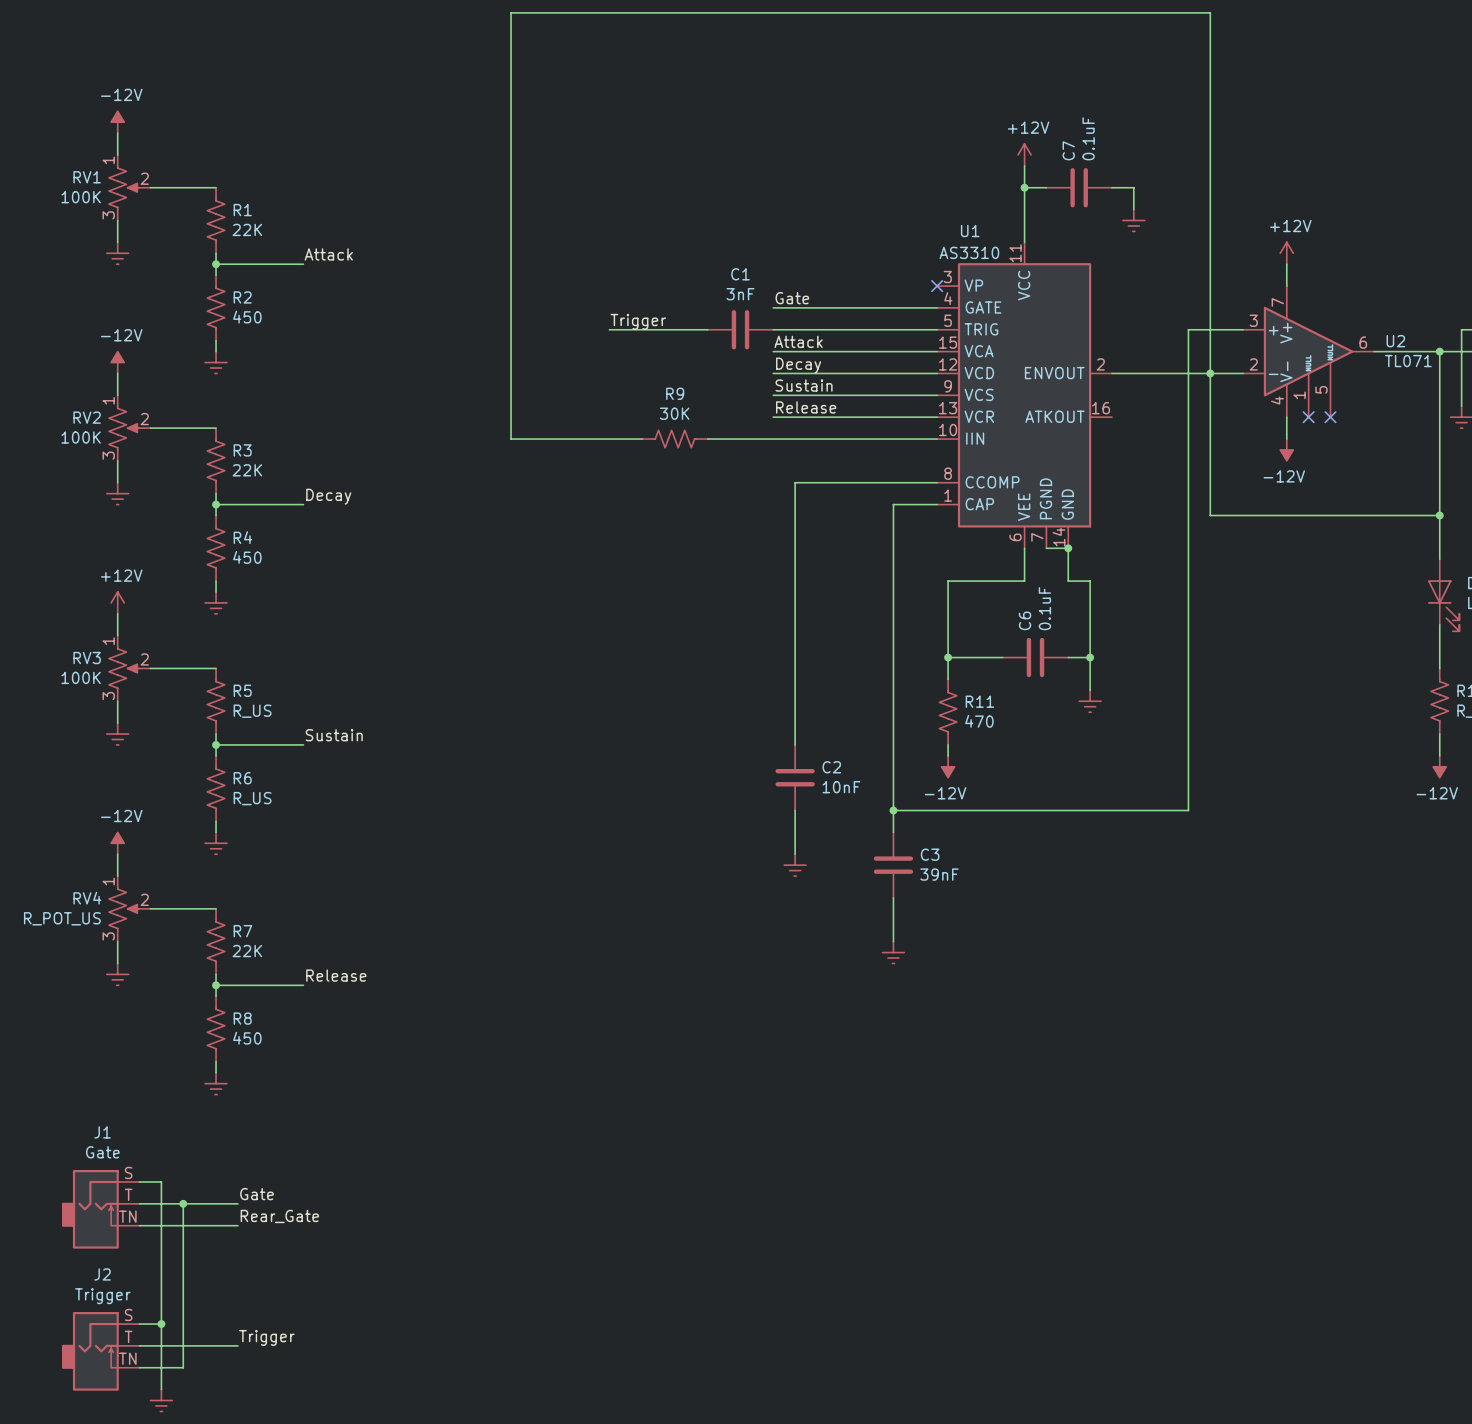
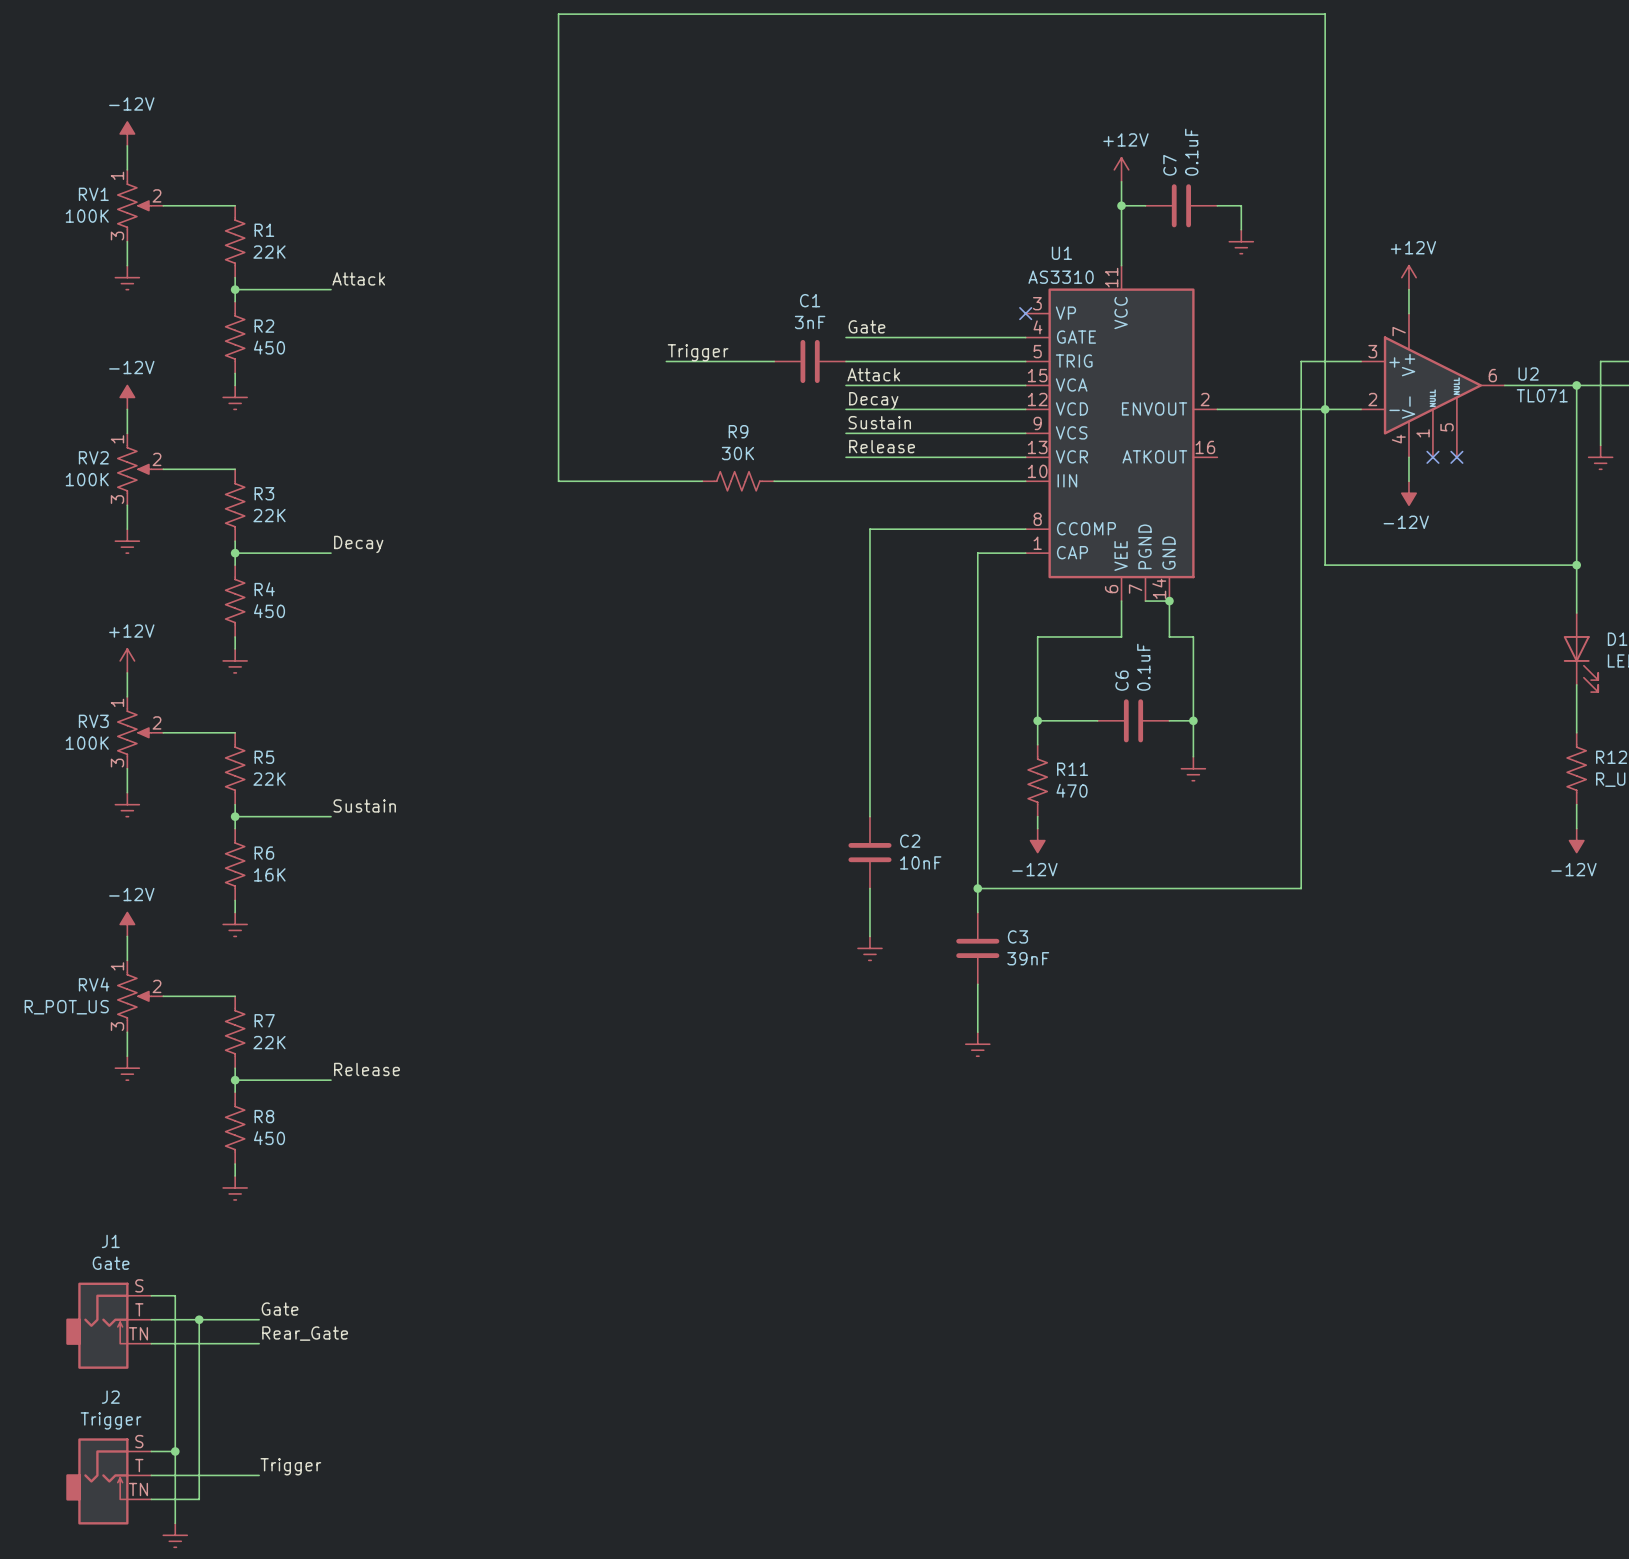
R5 value: R_US (252, 711) -> 22K (269, 779)
R6 value: R_US (252, 798) -> 16K (269, 874)

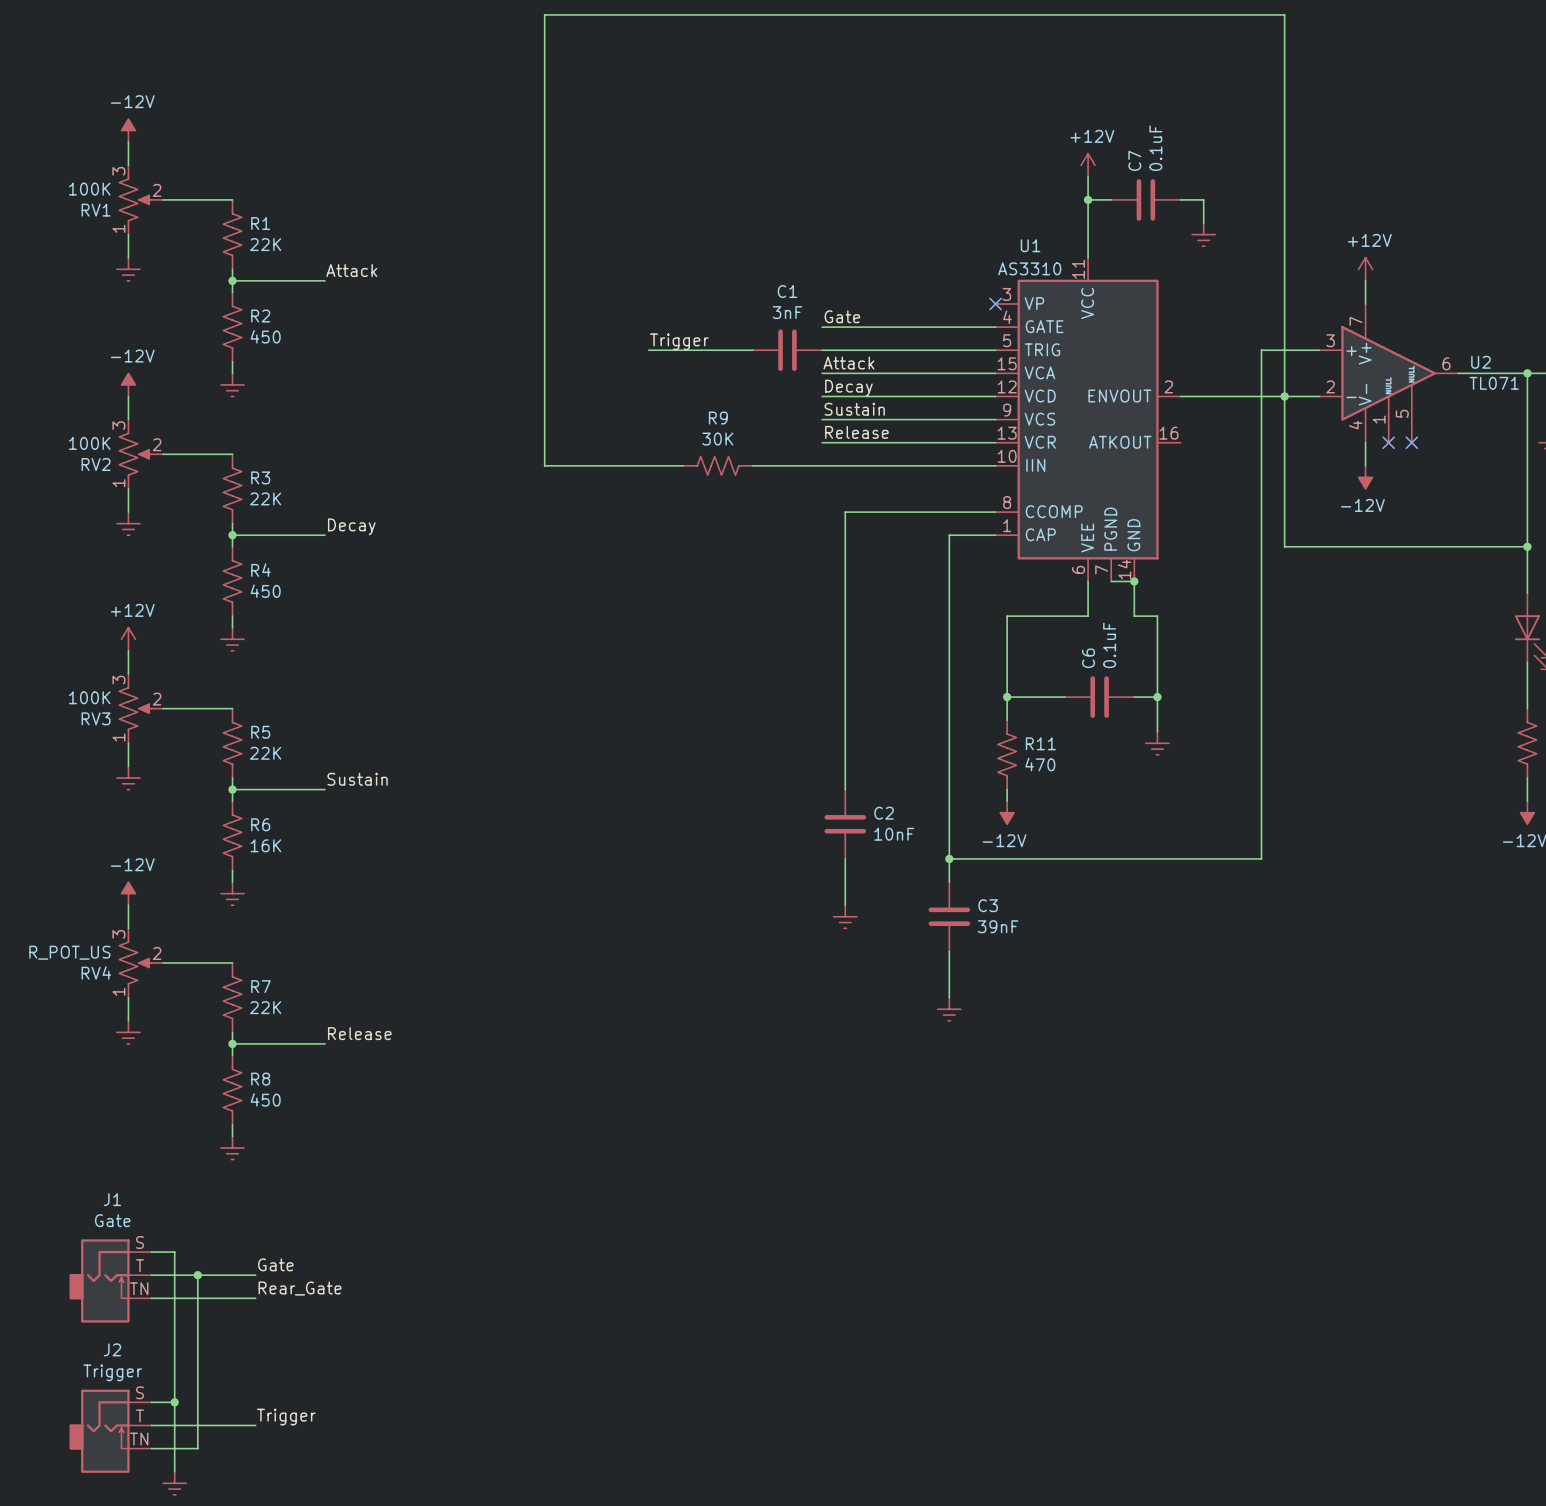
RV1 flip: as is (134, 205) -> up-down (135, 199)
RV2 flip: as is (134, 469) -> up-down (135, 454)
RV3 flip: as is (134, 732) -> up-down (135, 708)
RV4 flip: as is (134, 996) -> up-down (135, 963)

